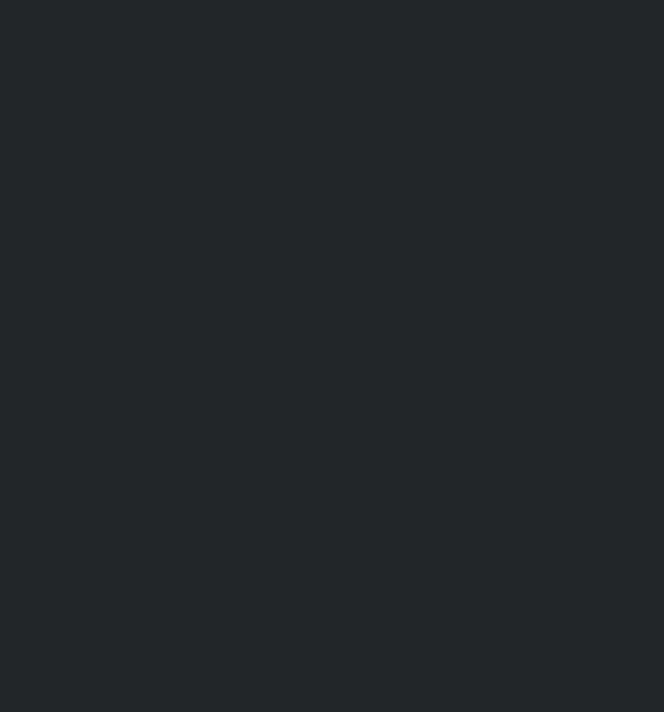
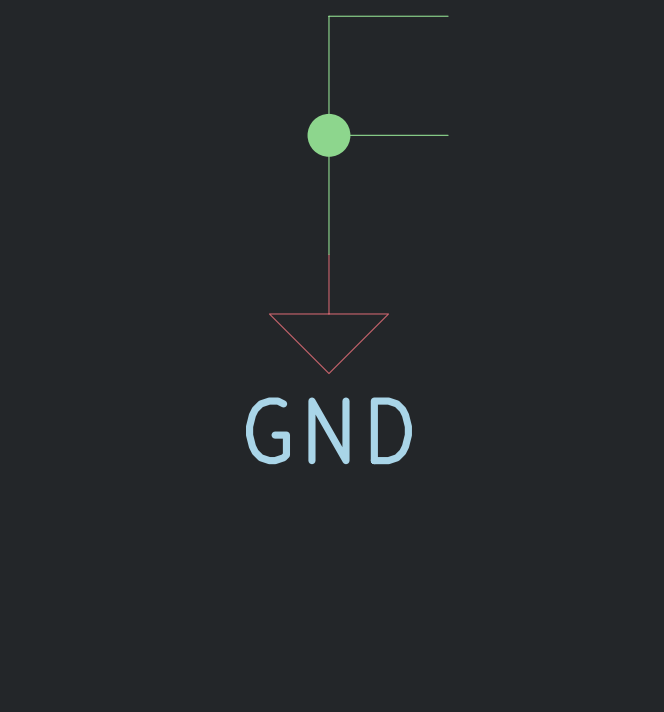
wire: none -> (448, 16) (328, 16) (328, 254)
wire: none -> (328, 135) (448, 135)
junction: none -> (328, 135)
power symbol: none -> GND (328, 313)

